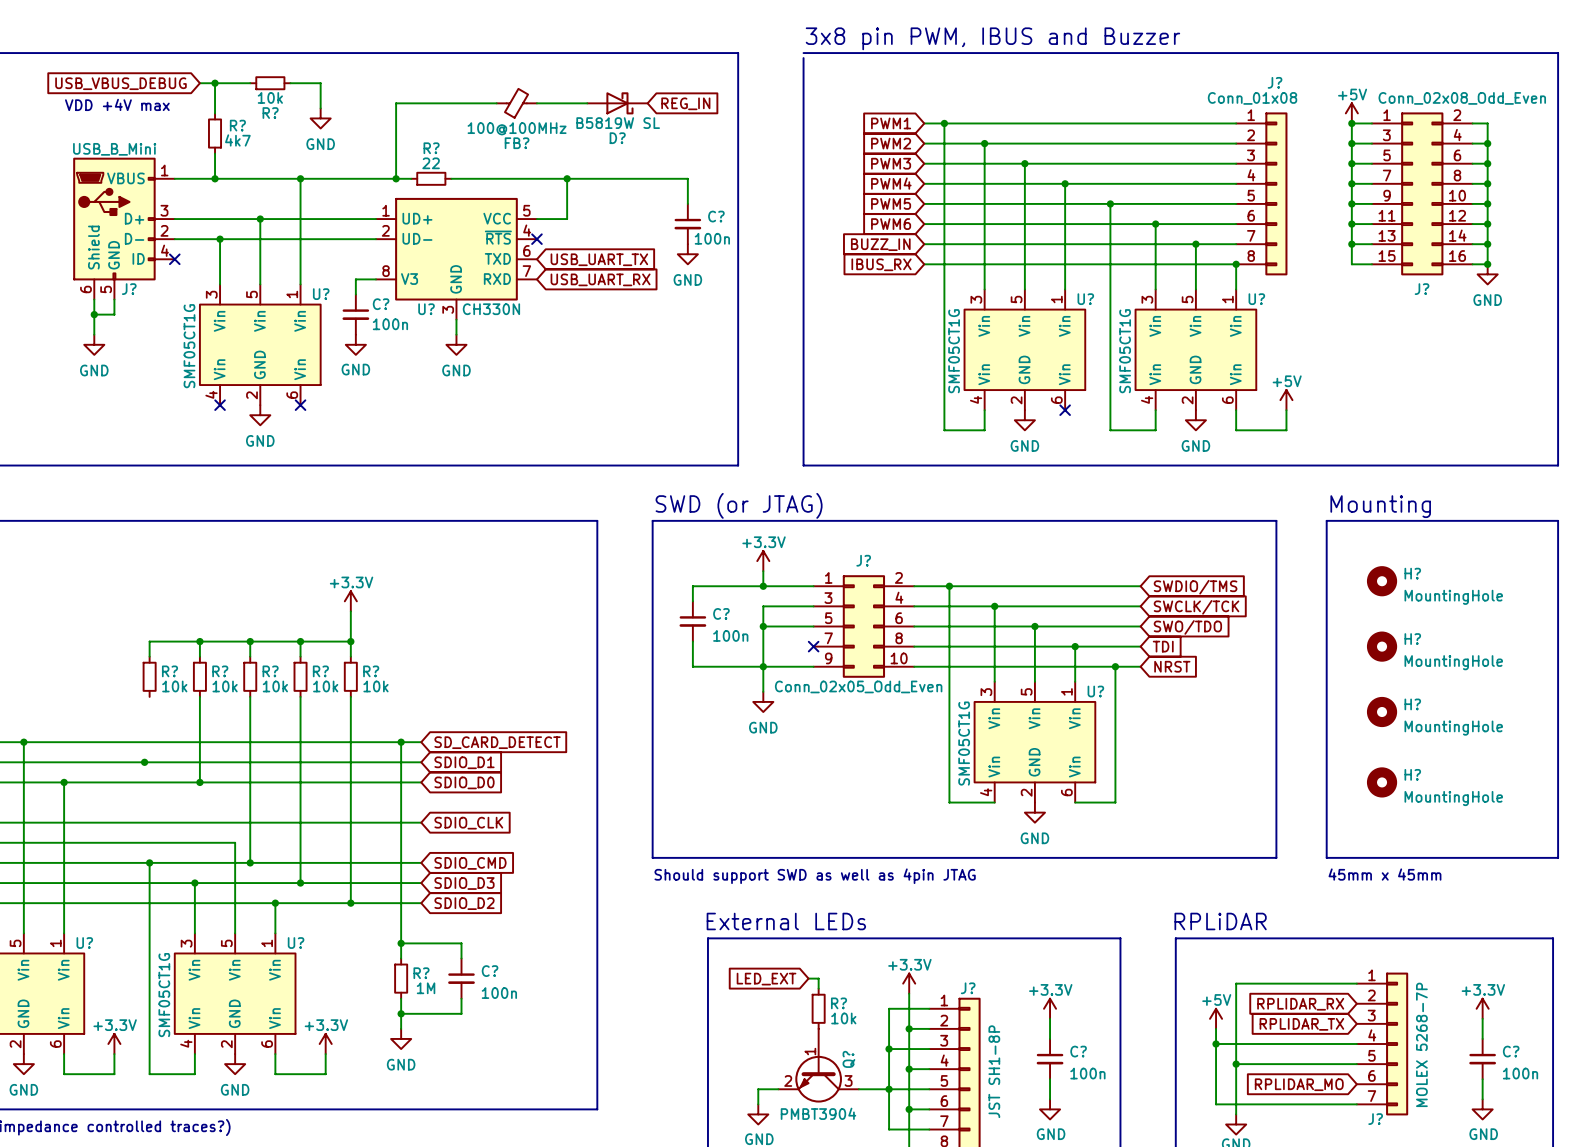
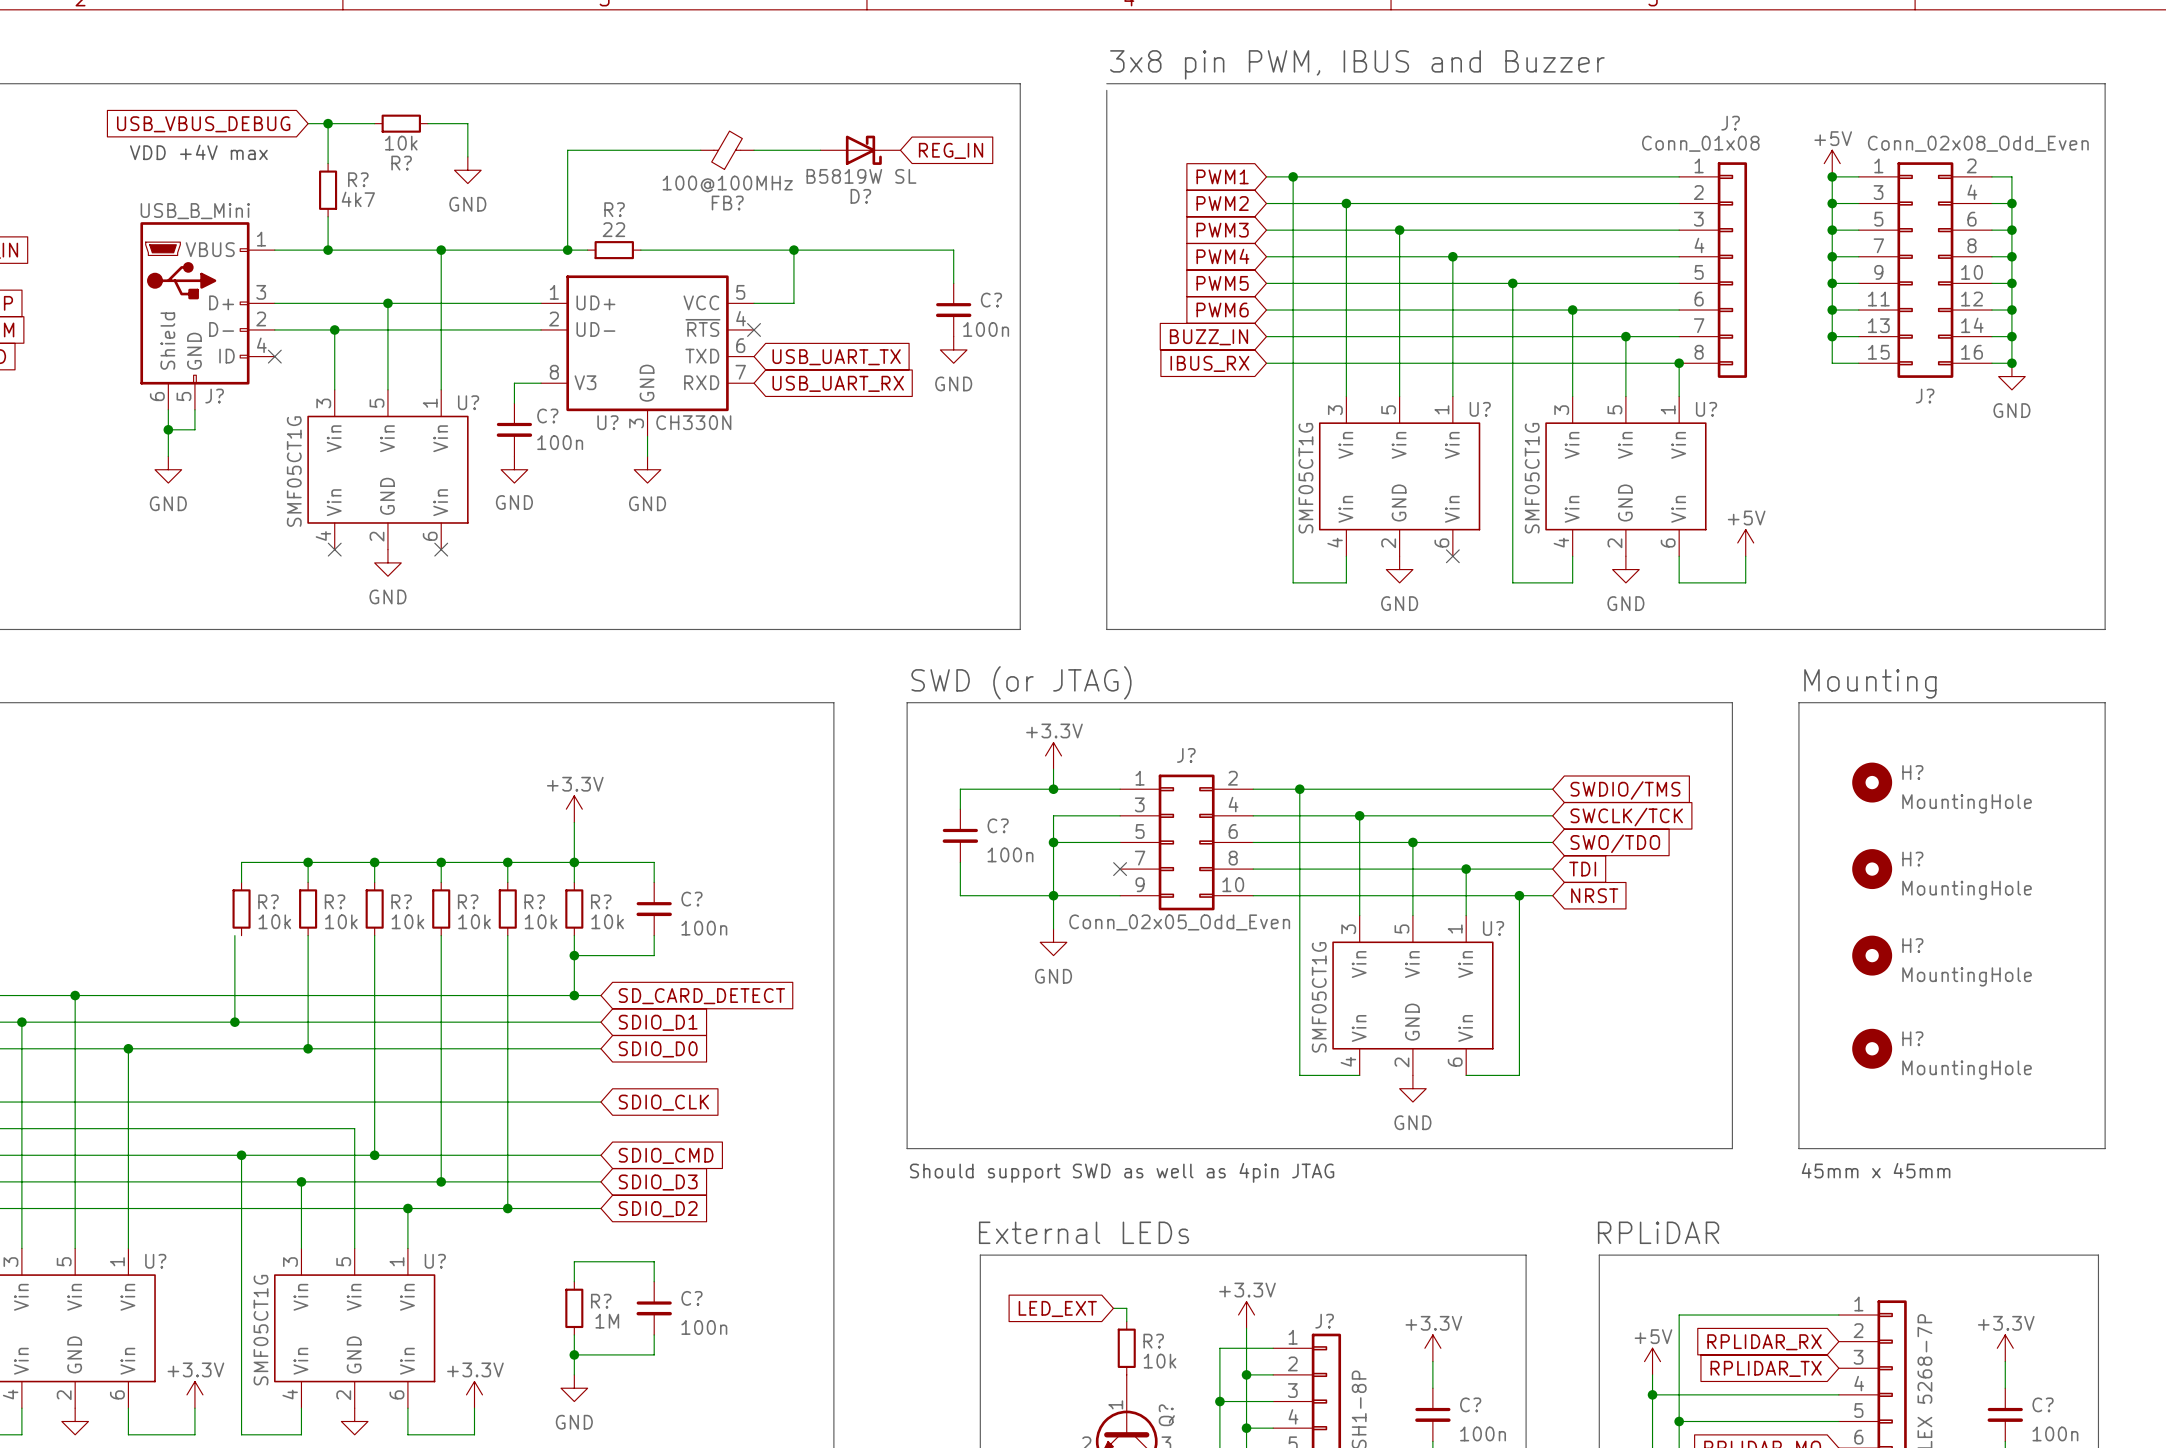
power symbol position: +3.3V (350, 601) -> +3.3V (574, 809)
wire: (350, 611) (350, 641) -> (654, 882) (654, 862) (507, 862)
wire: none -> (574, 822) (574, 882)
junction: none -> (574, 862)
R?: none -> 10k (574, 909)
C?: none -> 100n (654, 909)
wire: none -> (234, 935) (234, 1022)
wire: none -> (654, 935) (654, 955) (574, 955)
junction: none -> (574, 955)
wire: (401, 742) (401, 943) -> (574, 995) (574, 935)
junction: (401, 943) -> none

